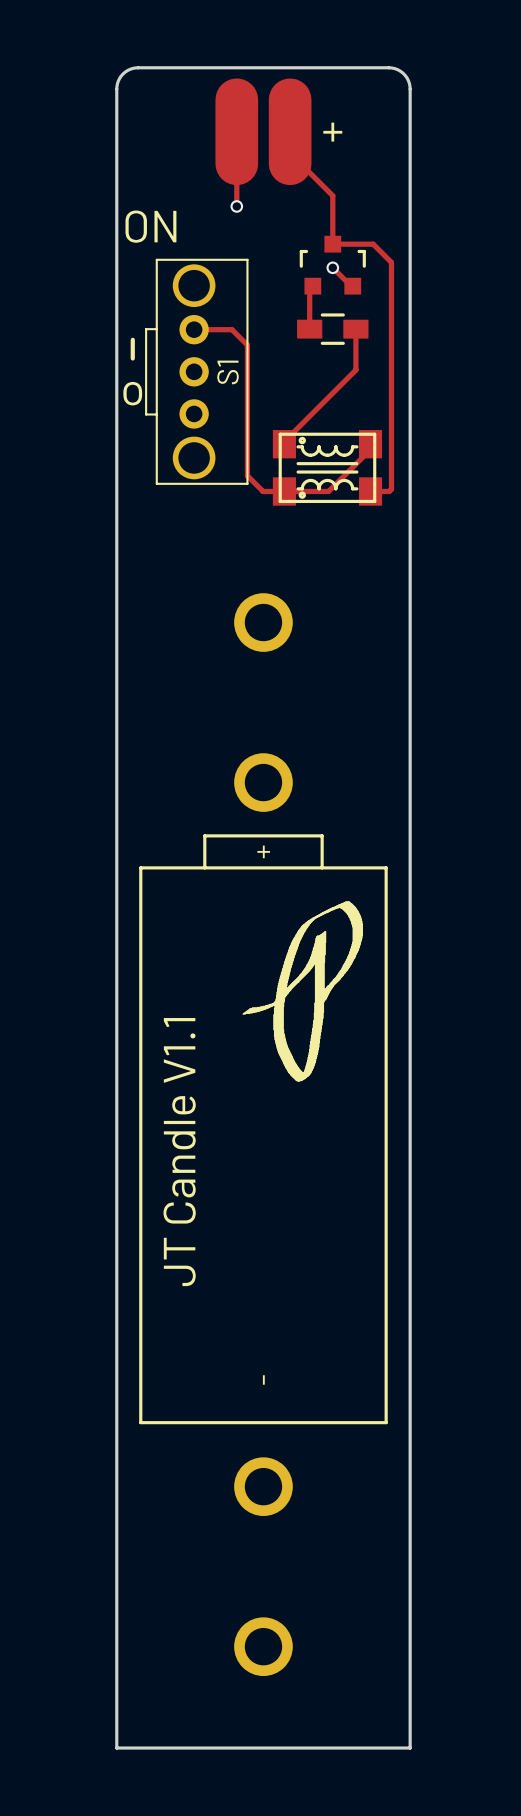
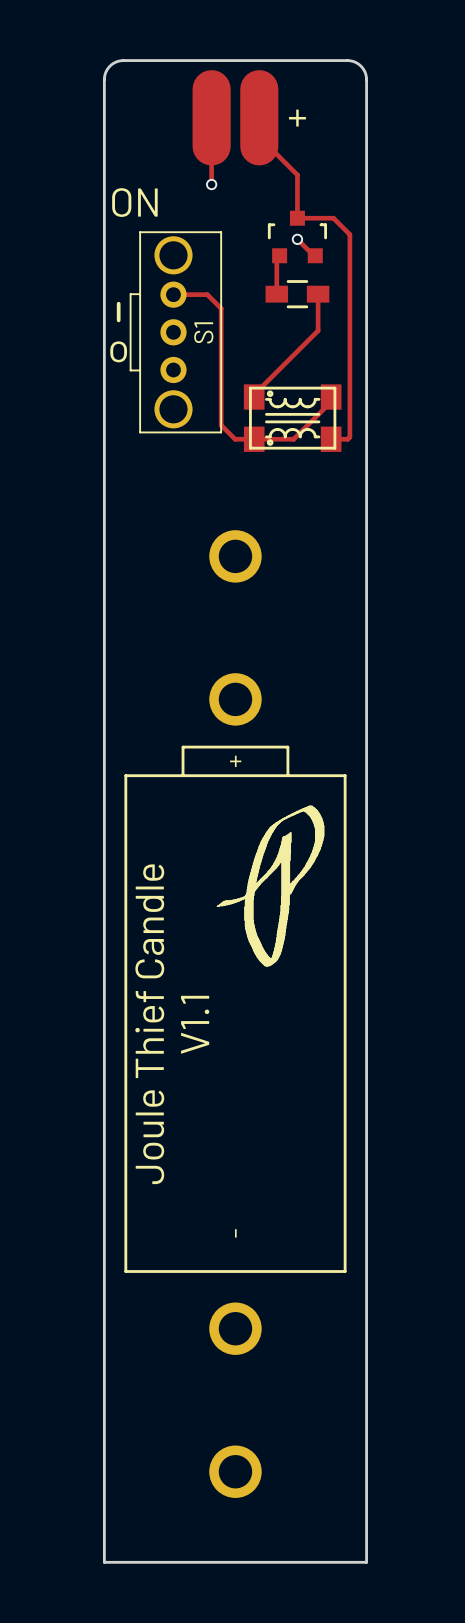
text: none -> V1.1 (195, 1024)
text: JT Candle V1.1 (179, 1152) -> Joule Thief Candle (149, 1024)

